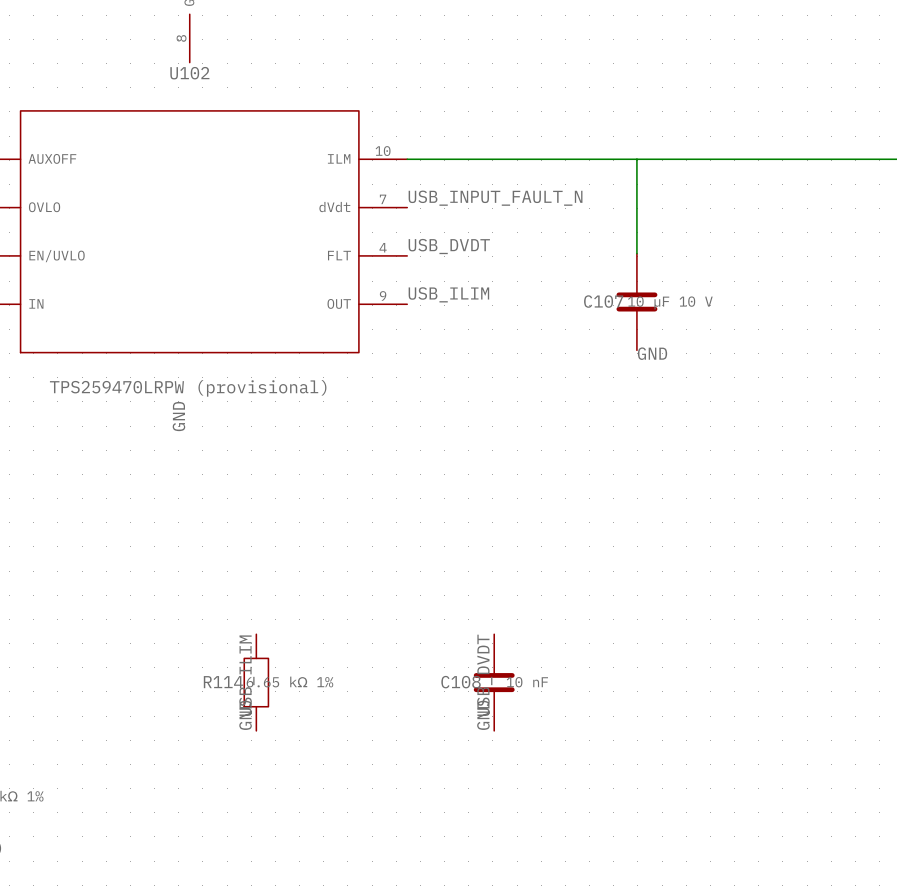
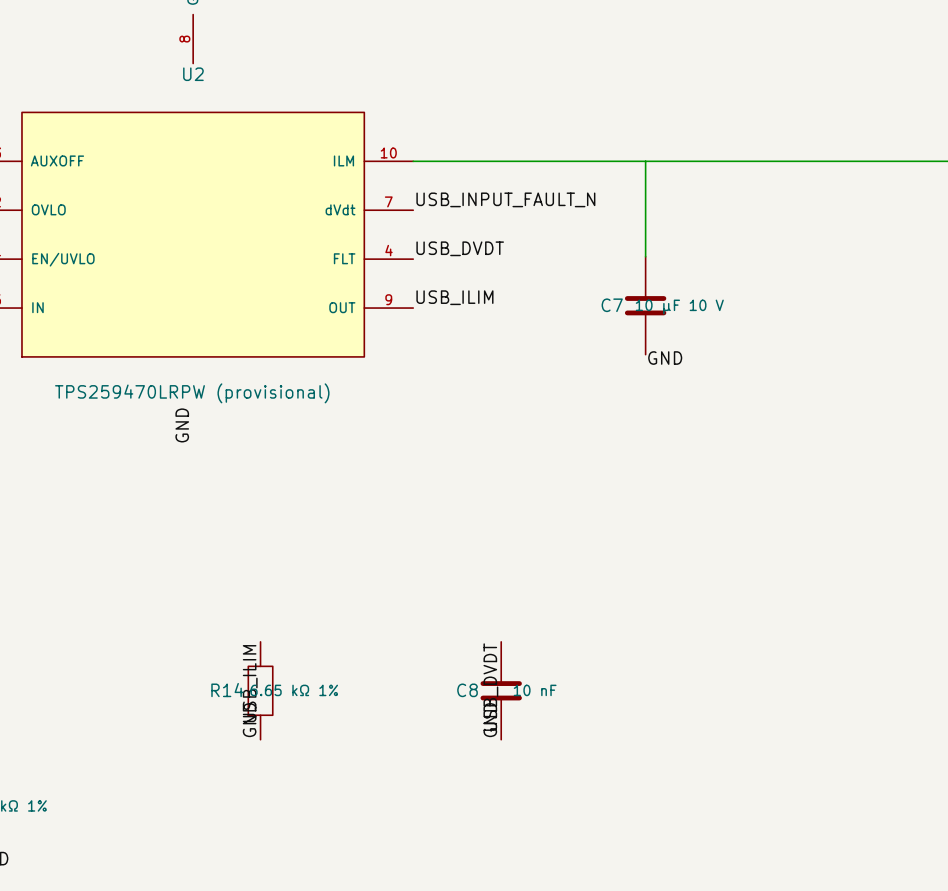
U102 name: U102 (189, 73) -> U2 (193, 74)
C107 name: C107 (603, 301) -> C7 (612, 305)
R114 name: R114 (223, 682) -> R14 (227, 690)
C108 name: C108 (461, 682) -> C8 (467, 690)

